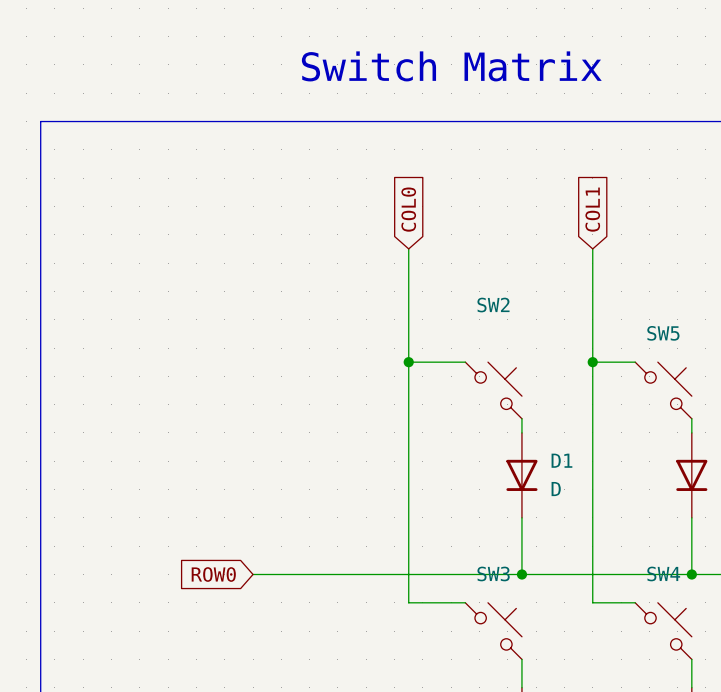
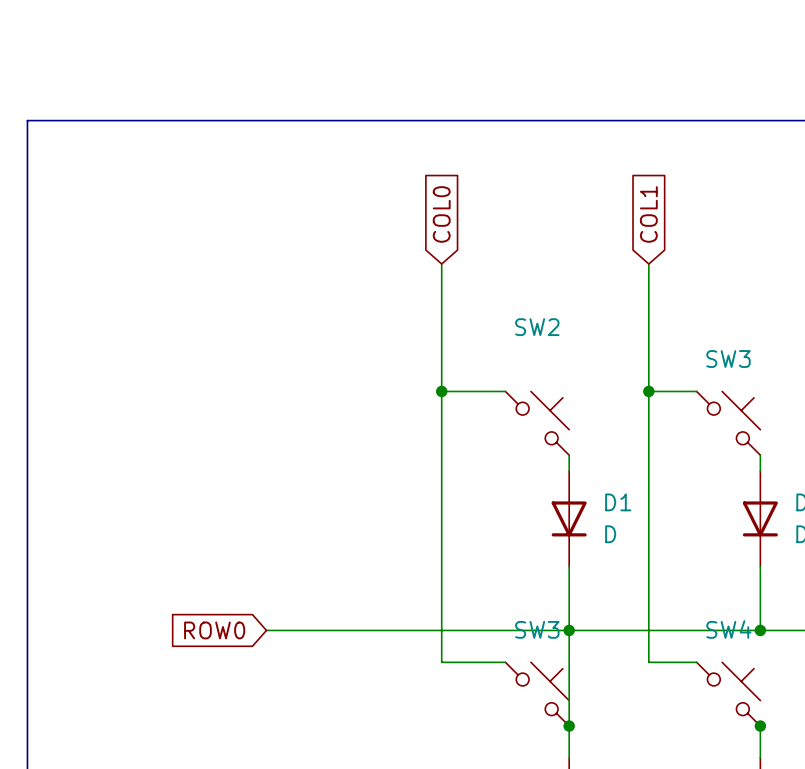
text: Switch Matrix (451, 66) -> none
SW5 name: SW5 (663, 333) -> SW3 (728, 359)
wire: none -> (569, 630) (569, 726)
junction: none -> (569, 726)
junction: none -> (760, 726)

